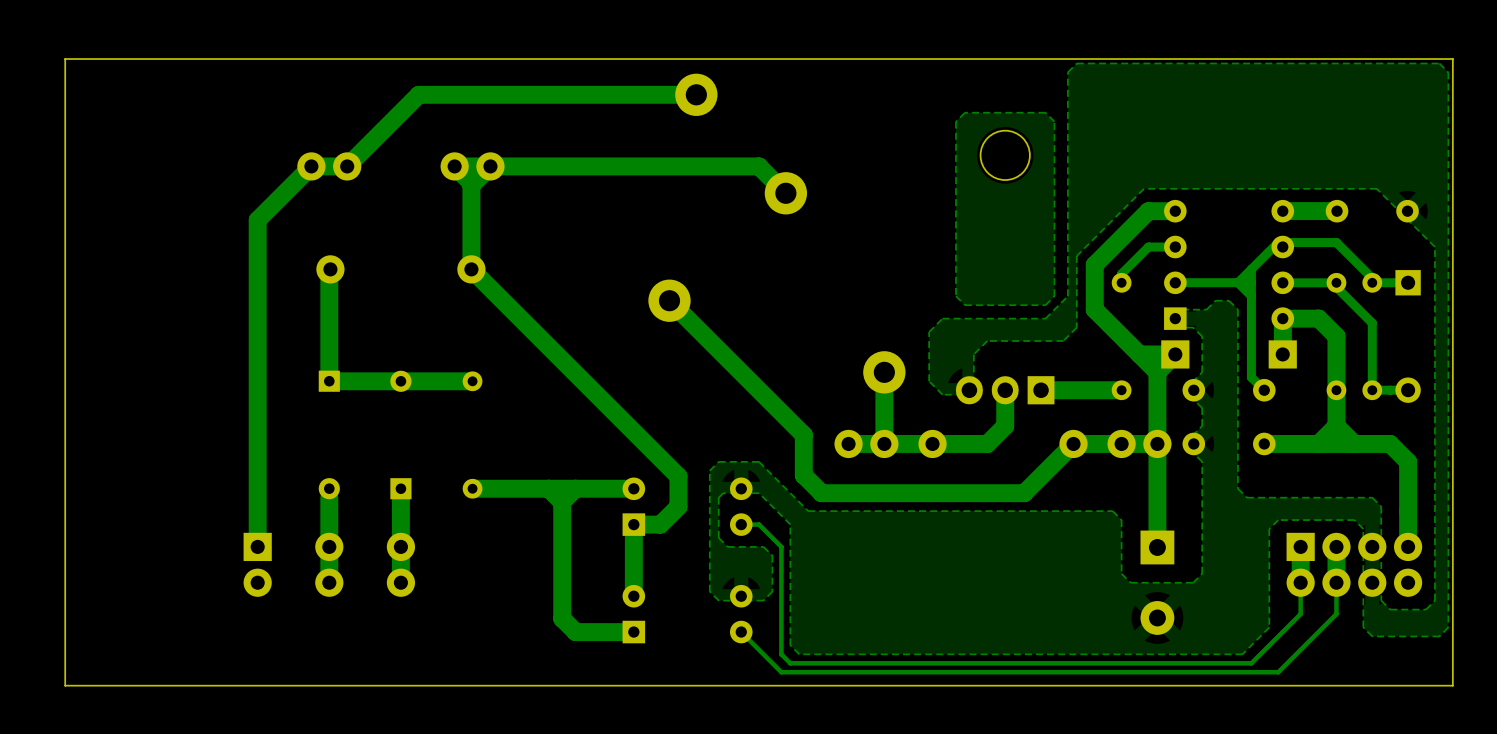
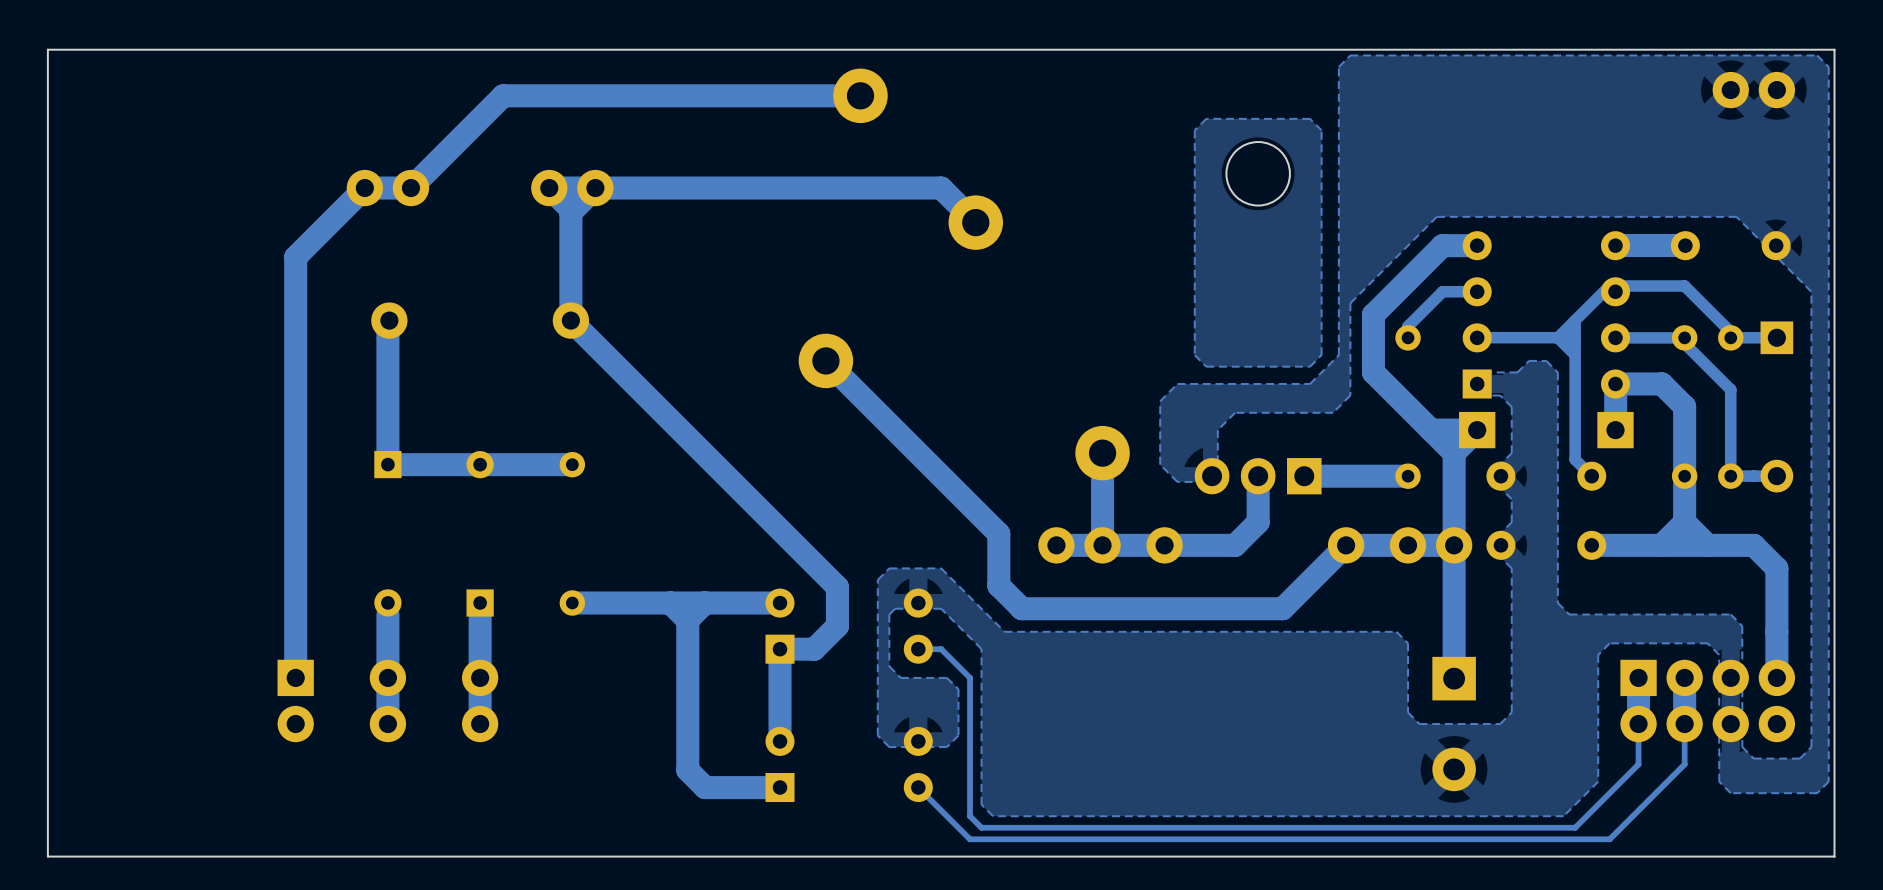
part: none -> (1753, 90)

